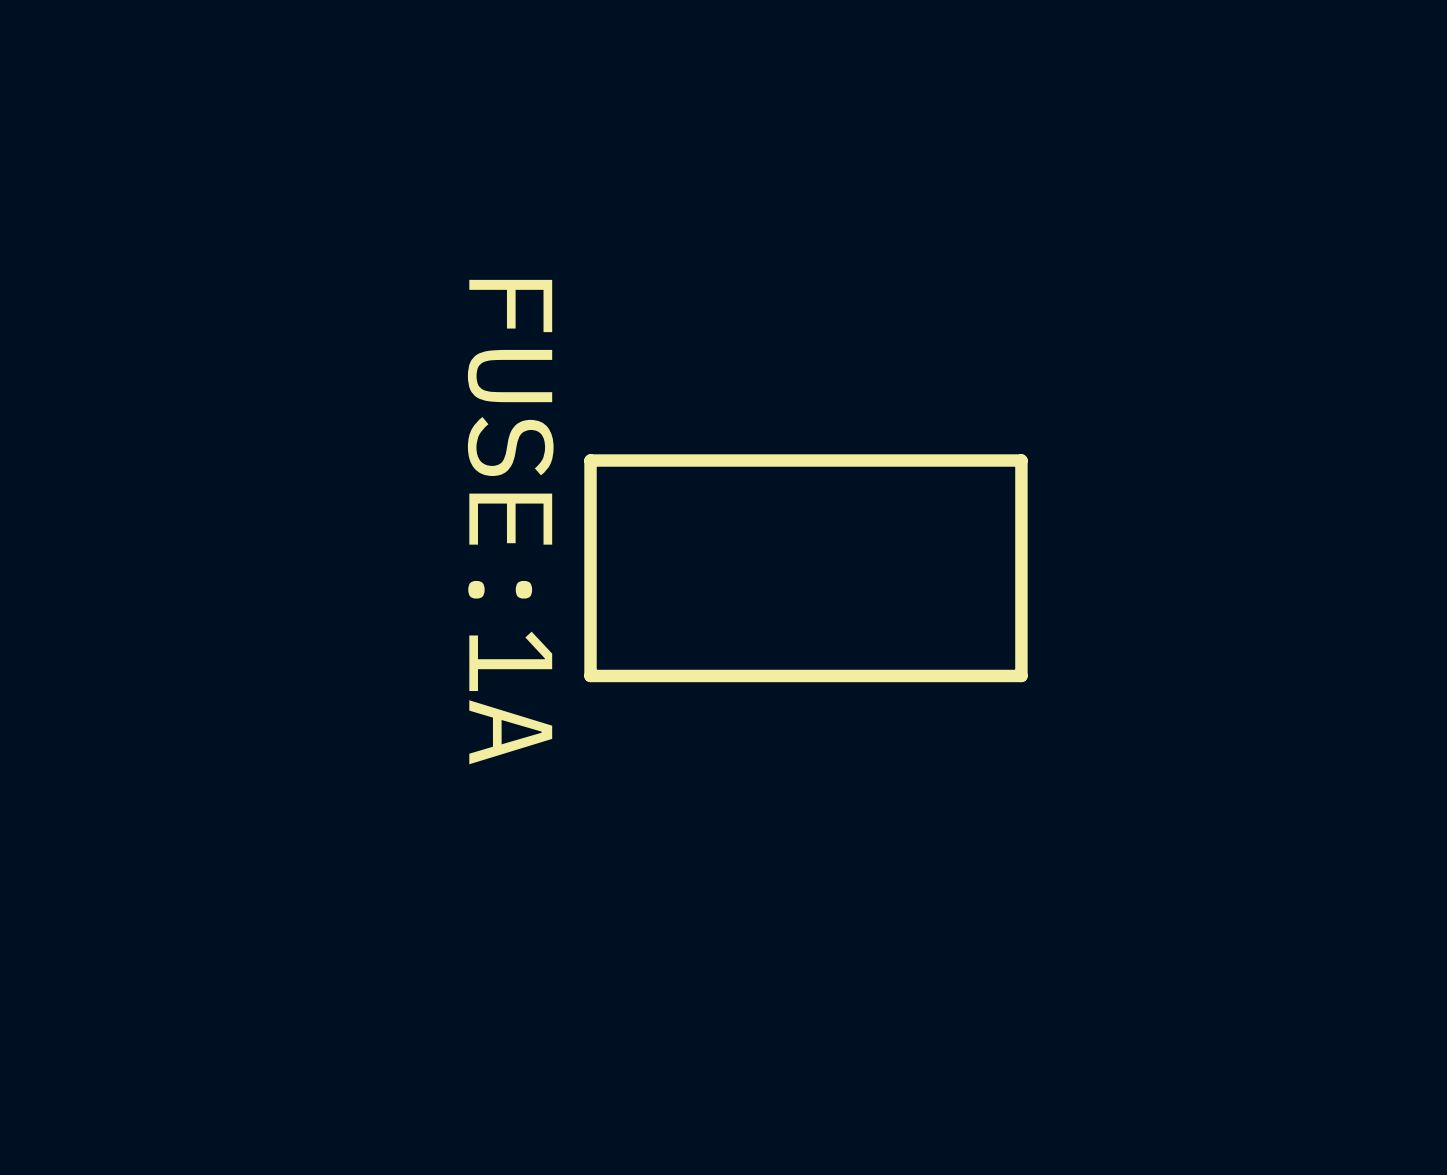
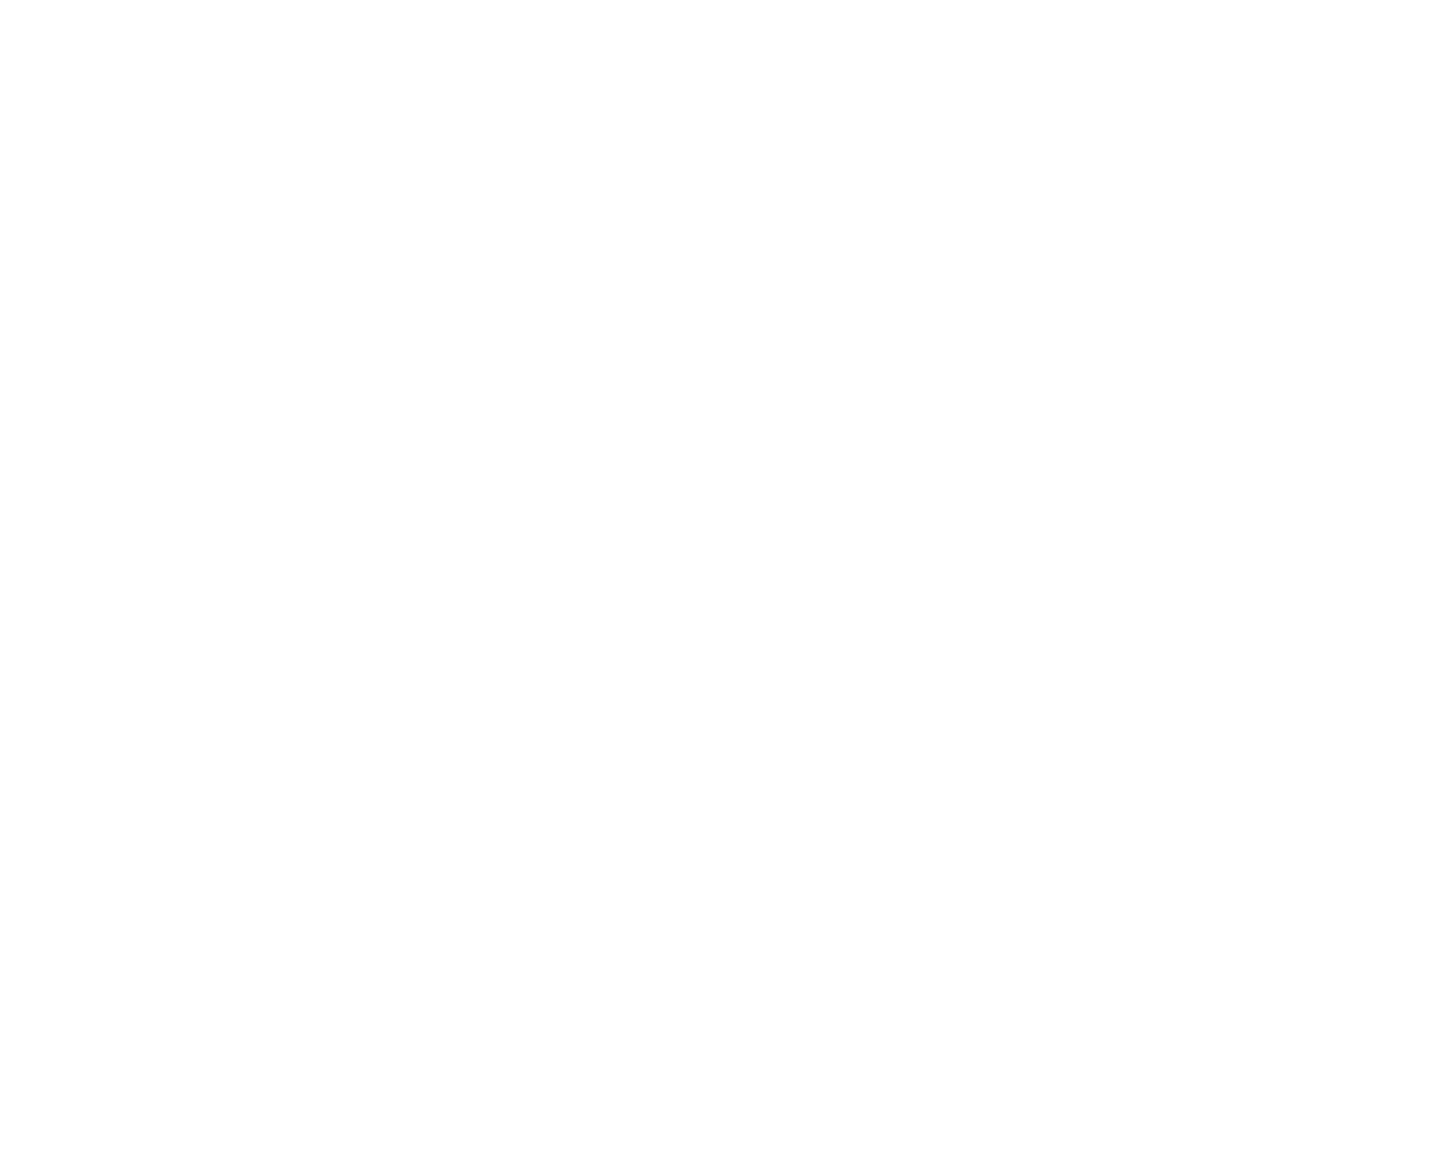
line: (1021, 460) (590, 460) (590, 675) (1021, 675) (1021, 460) -> none
text: FUSE:1A (510, 522) -> none

